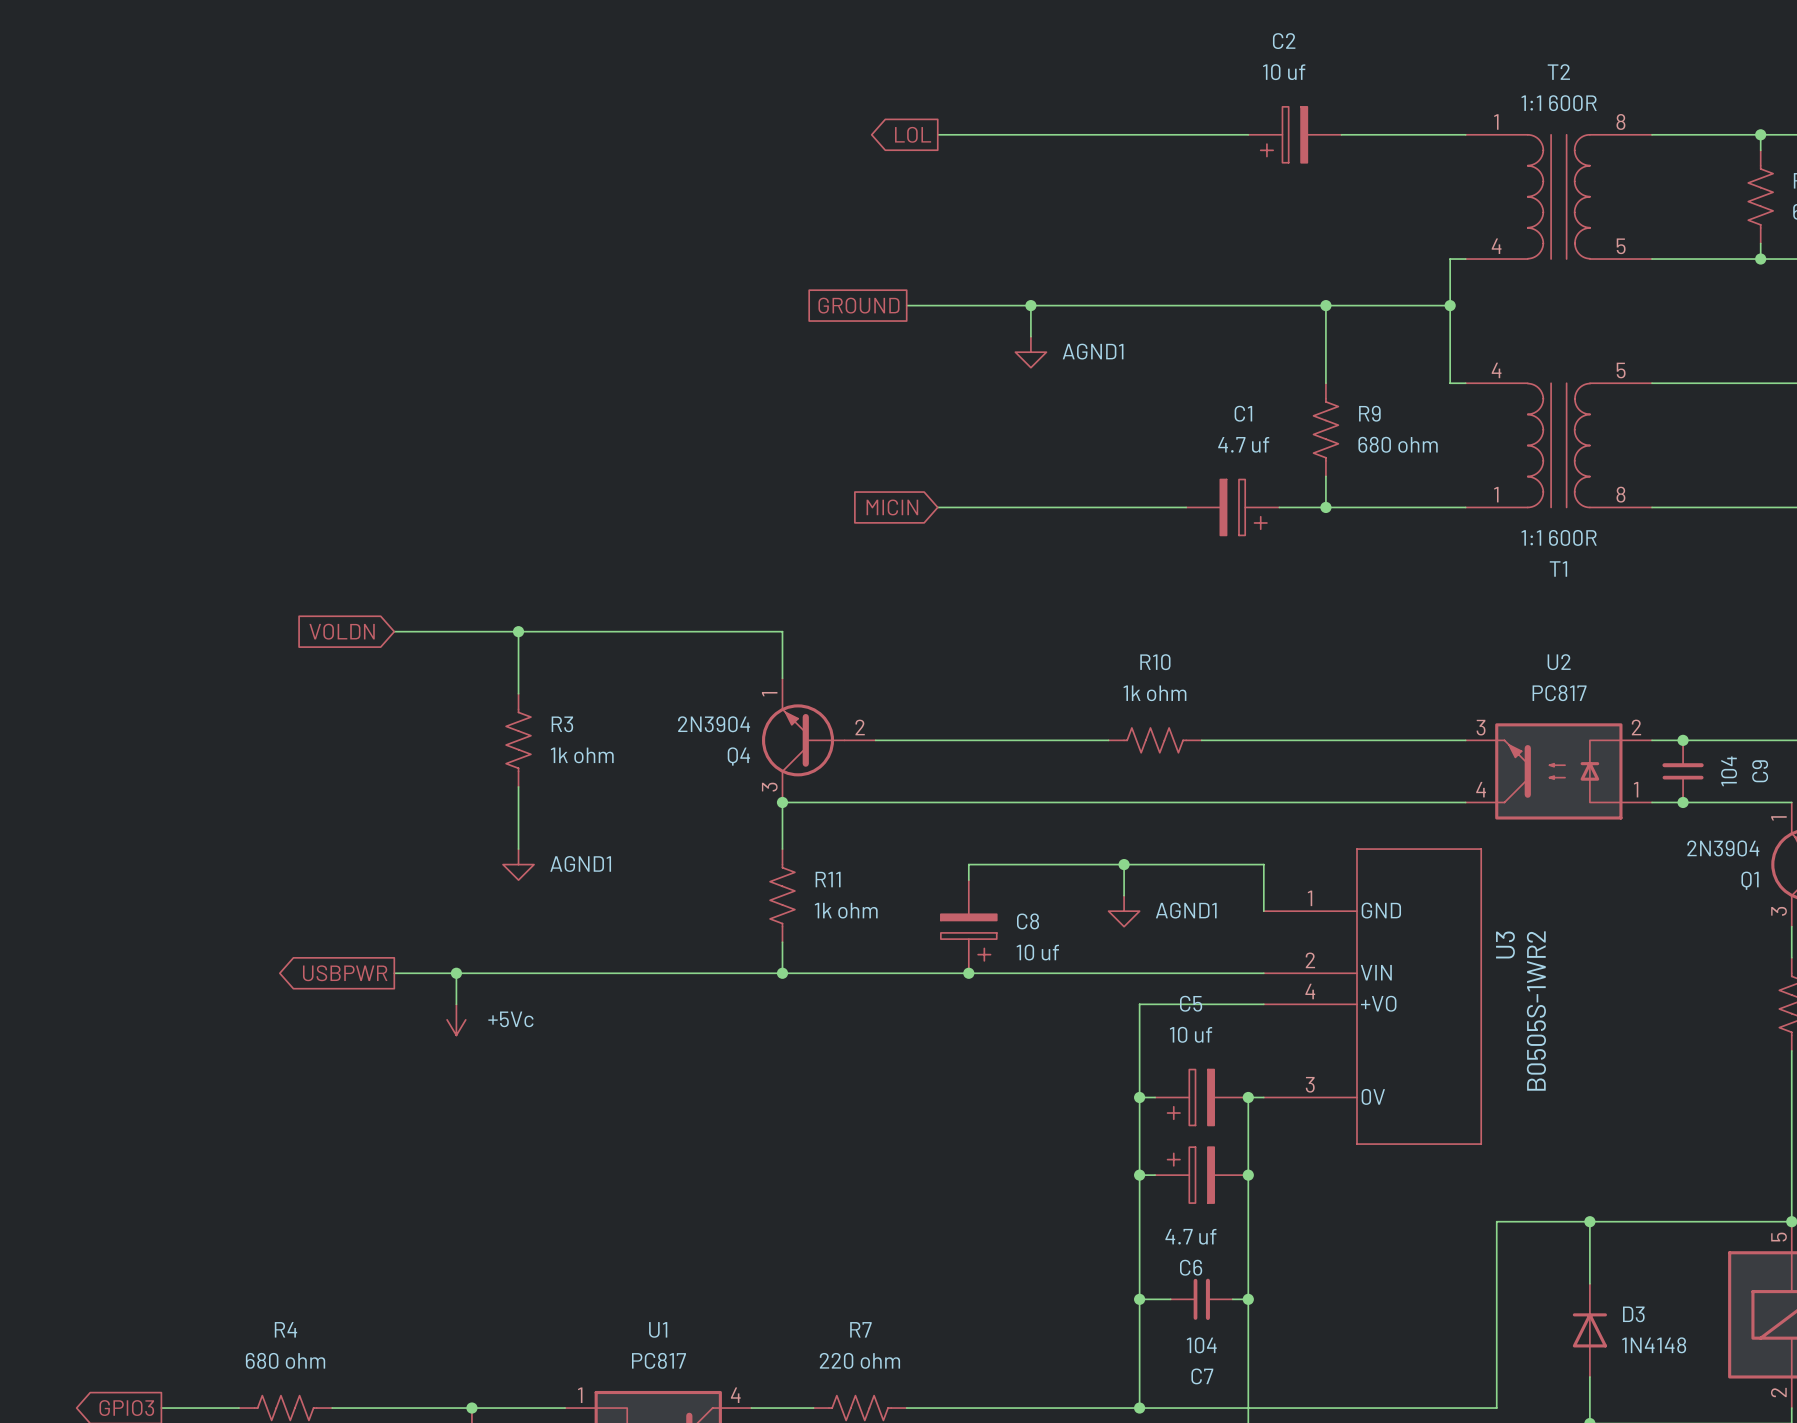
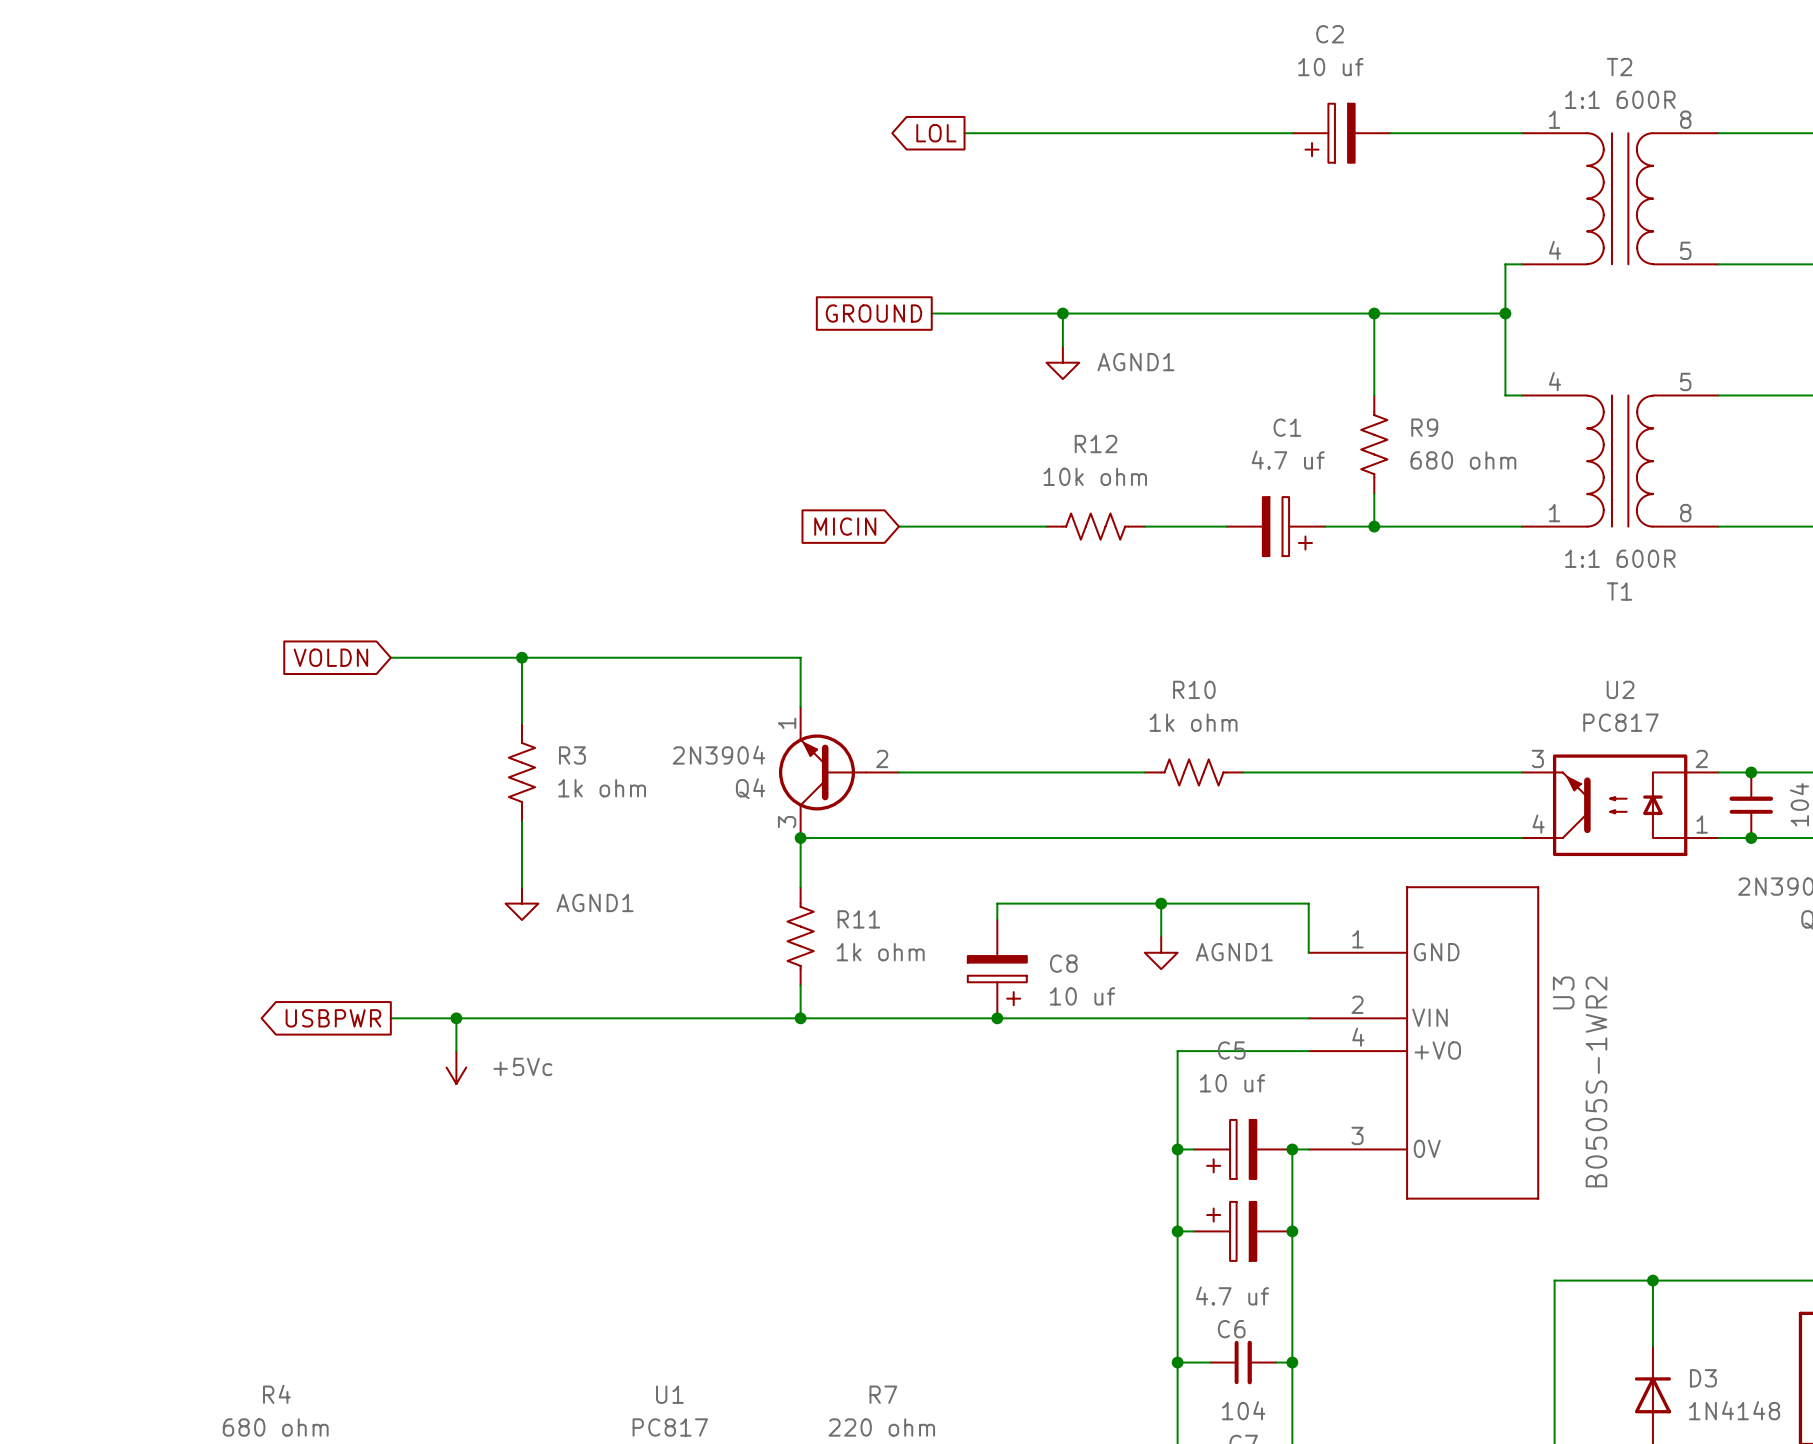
wire: none -> (898, 526) (964, 526)
global label position: MICIN (892, 507) -> MICIN (845, 526)
R12: none -> 10k ohm (1095, 526)

